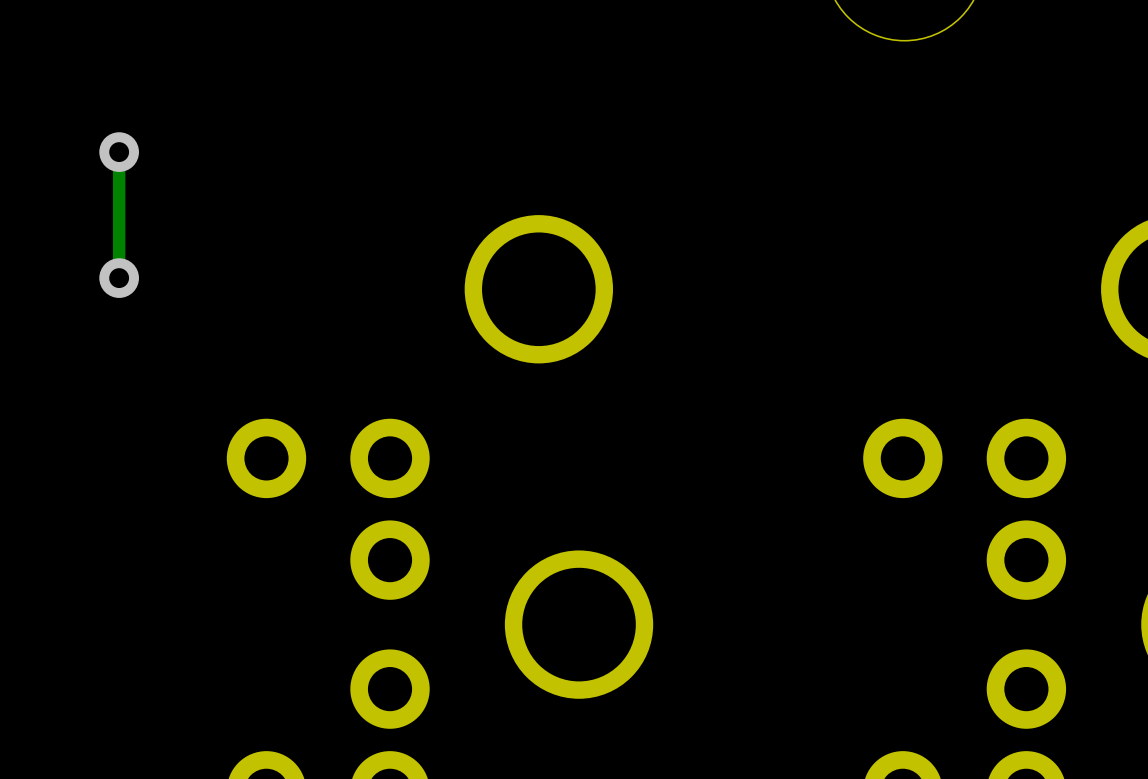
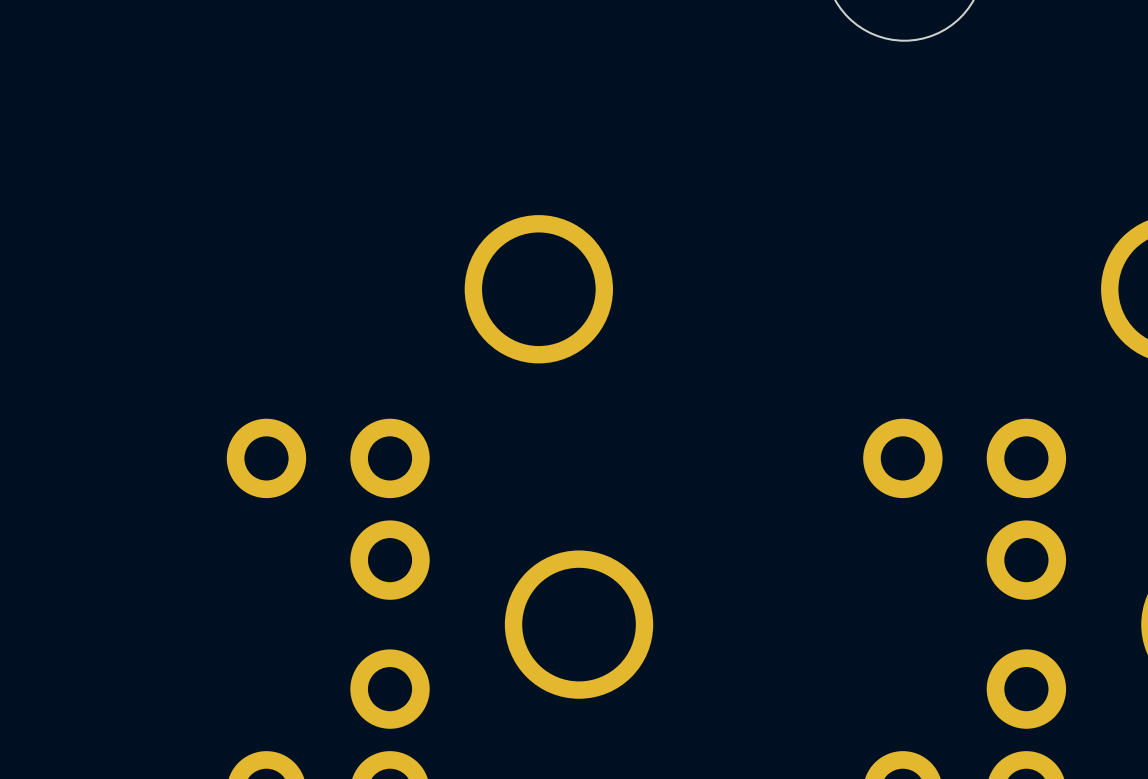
track: (119, 152) (119, 278) -> none
via: (119, 152) -> none
via: (119, 278) -> none

